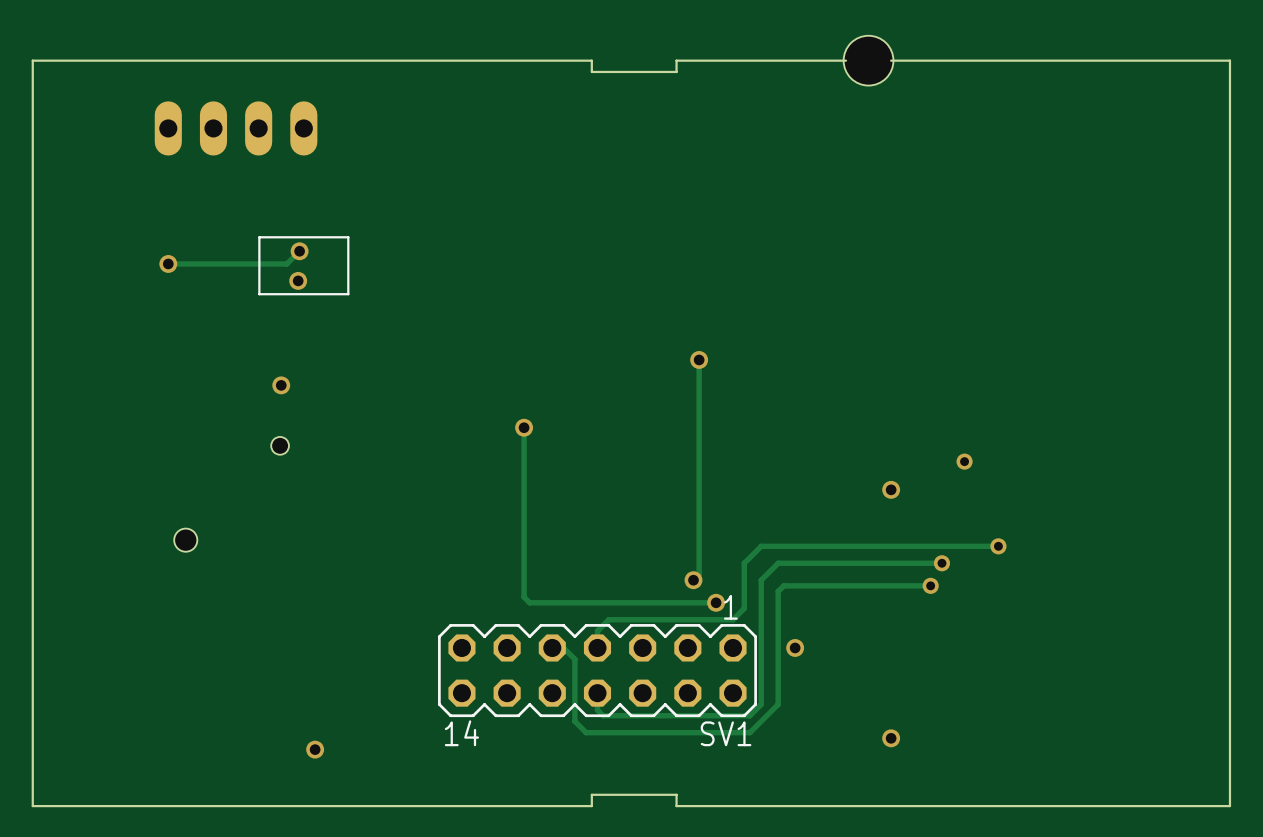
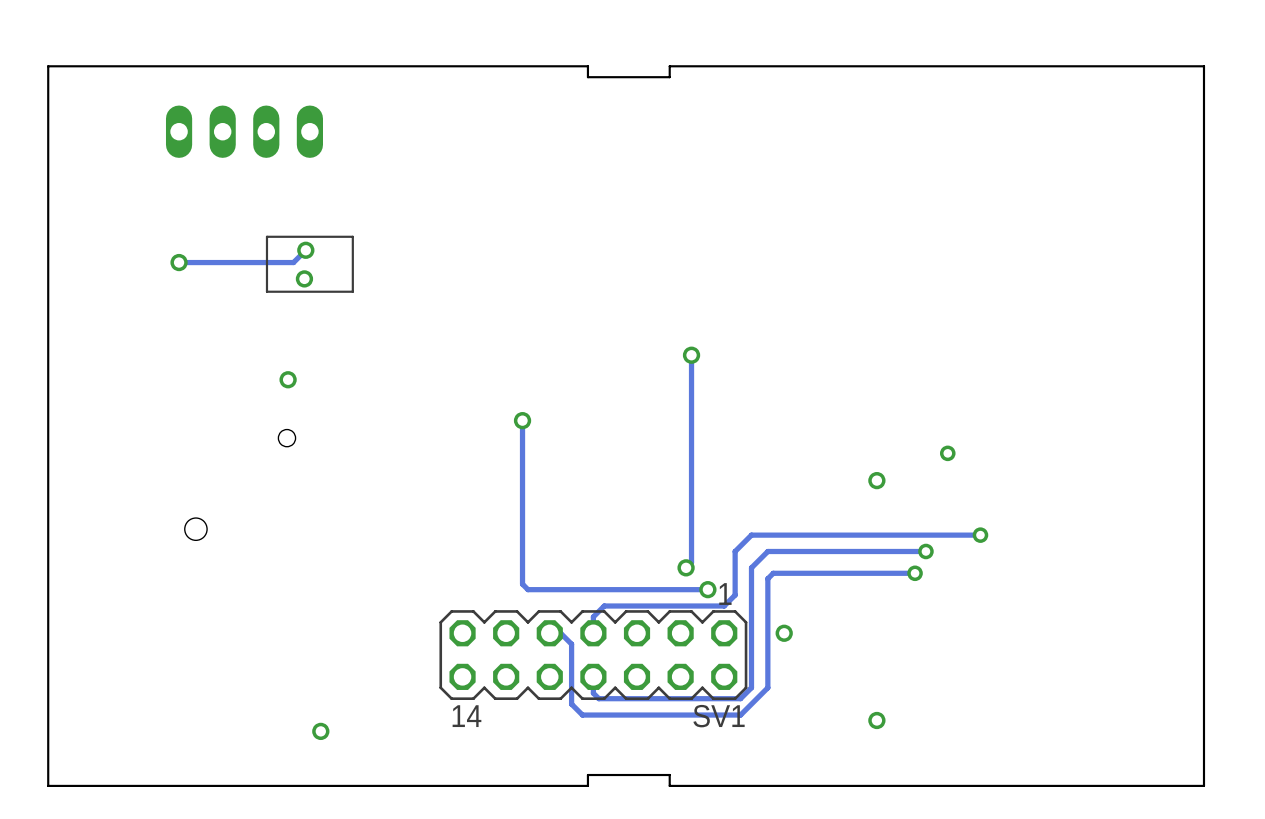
hole: (868, 60) -> none
board edge: none -> (876, 66) (833, 66)

